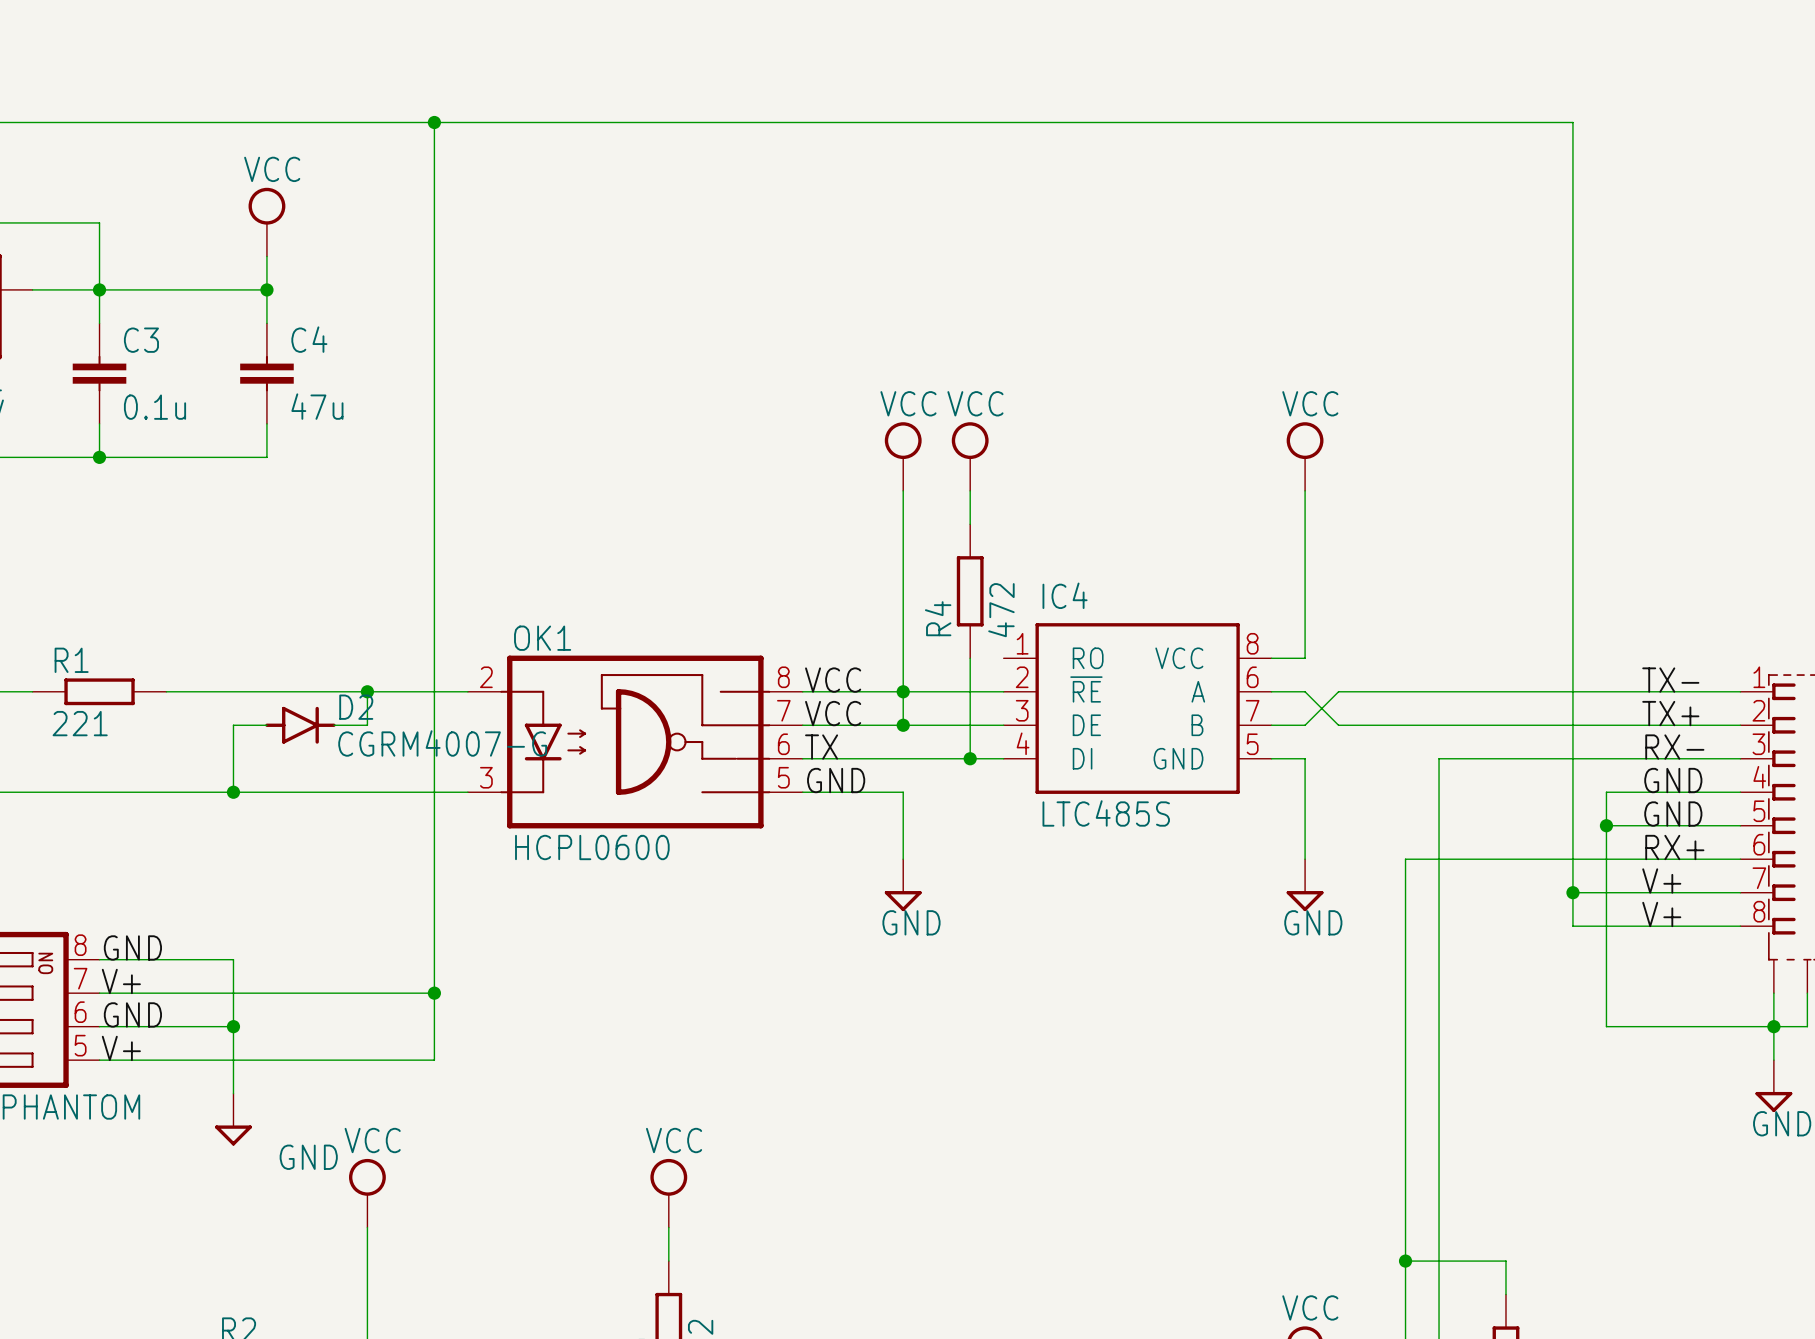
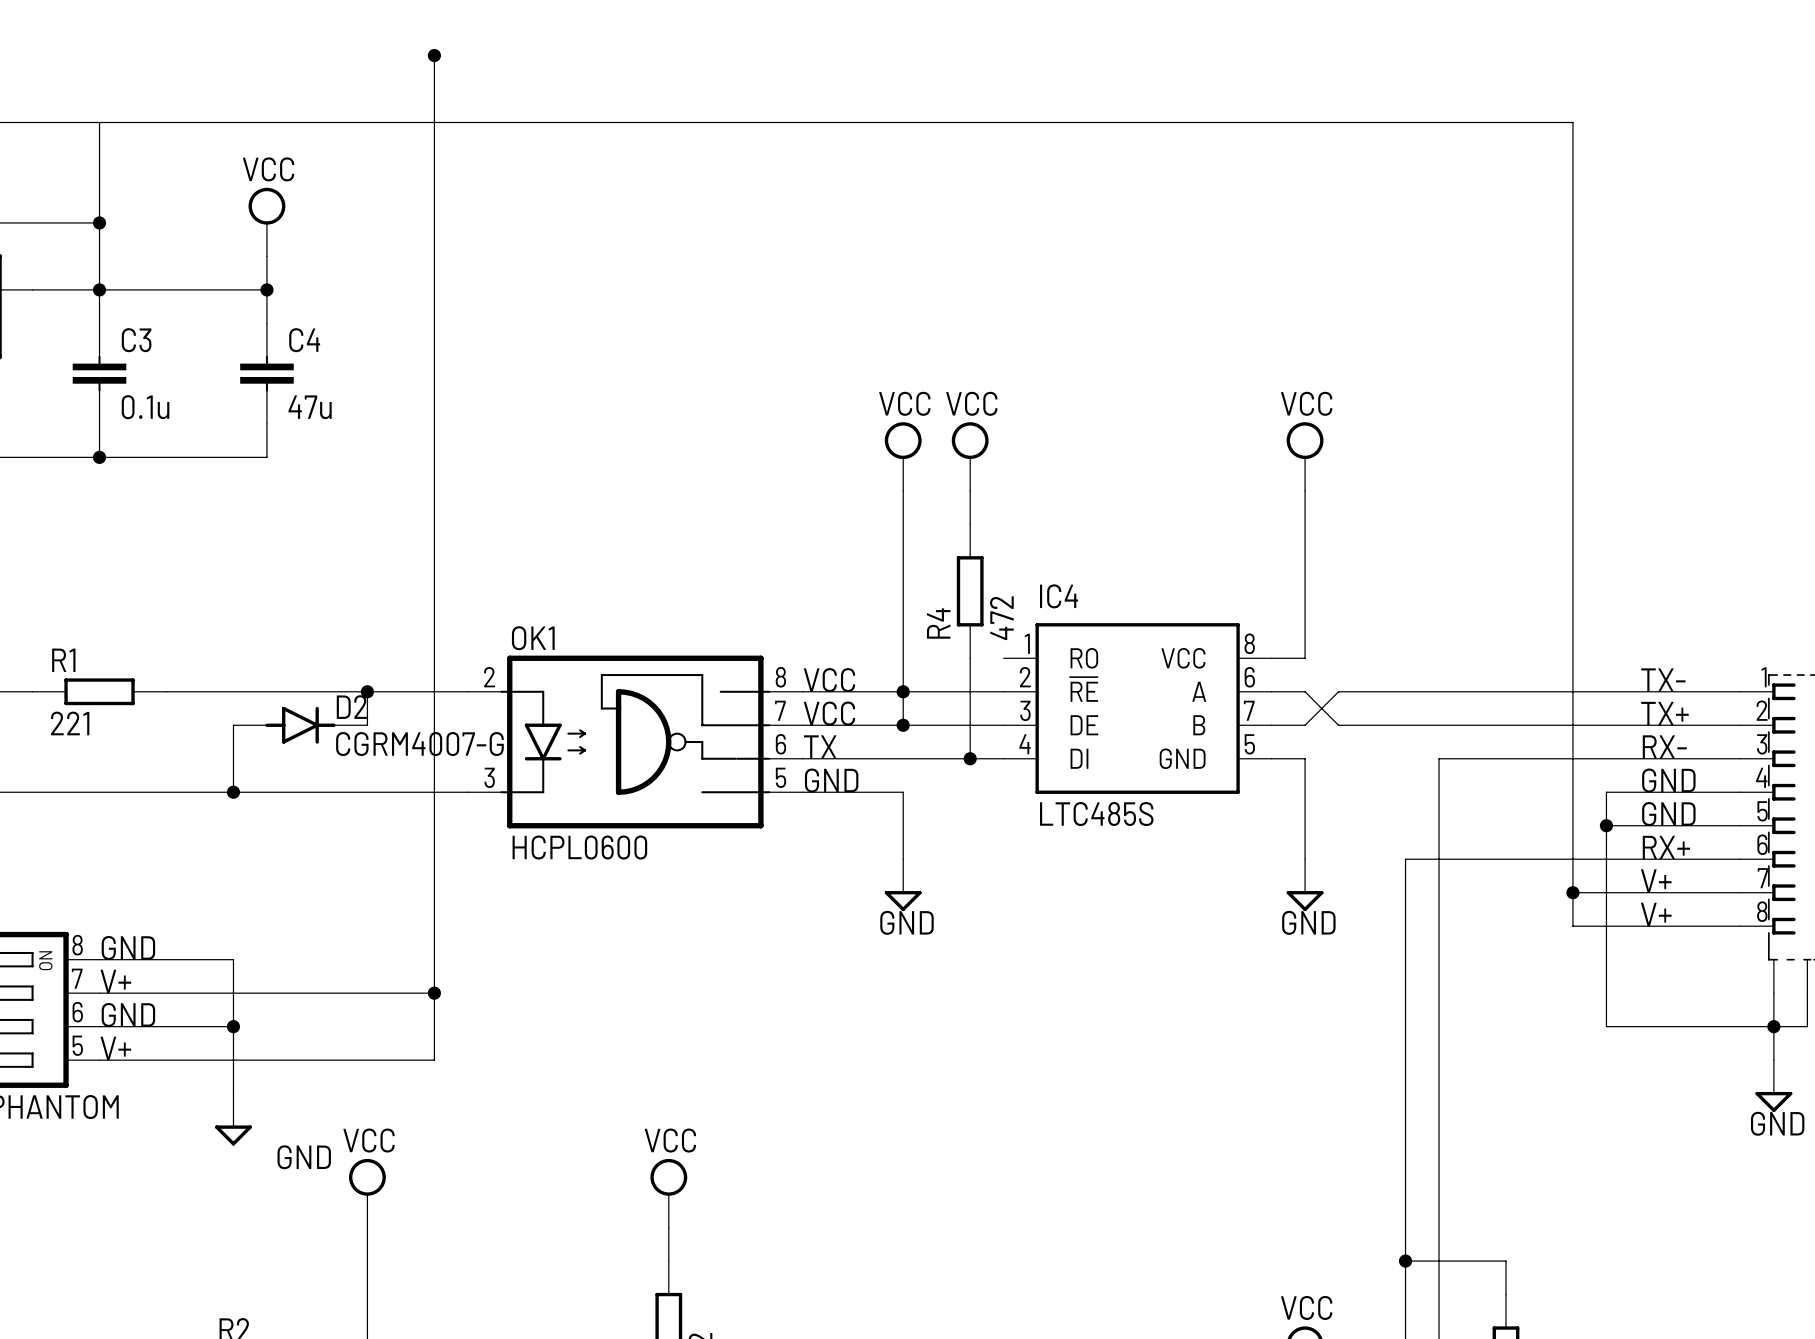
wire: none -> (434, 55) (434, 122)
wire: none -> (99, 122) (99, 222)
junction position: (434, 122) -> (434, 55)
junction: none -> (99, 222)

